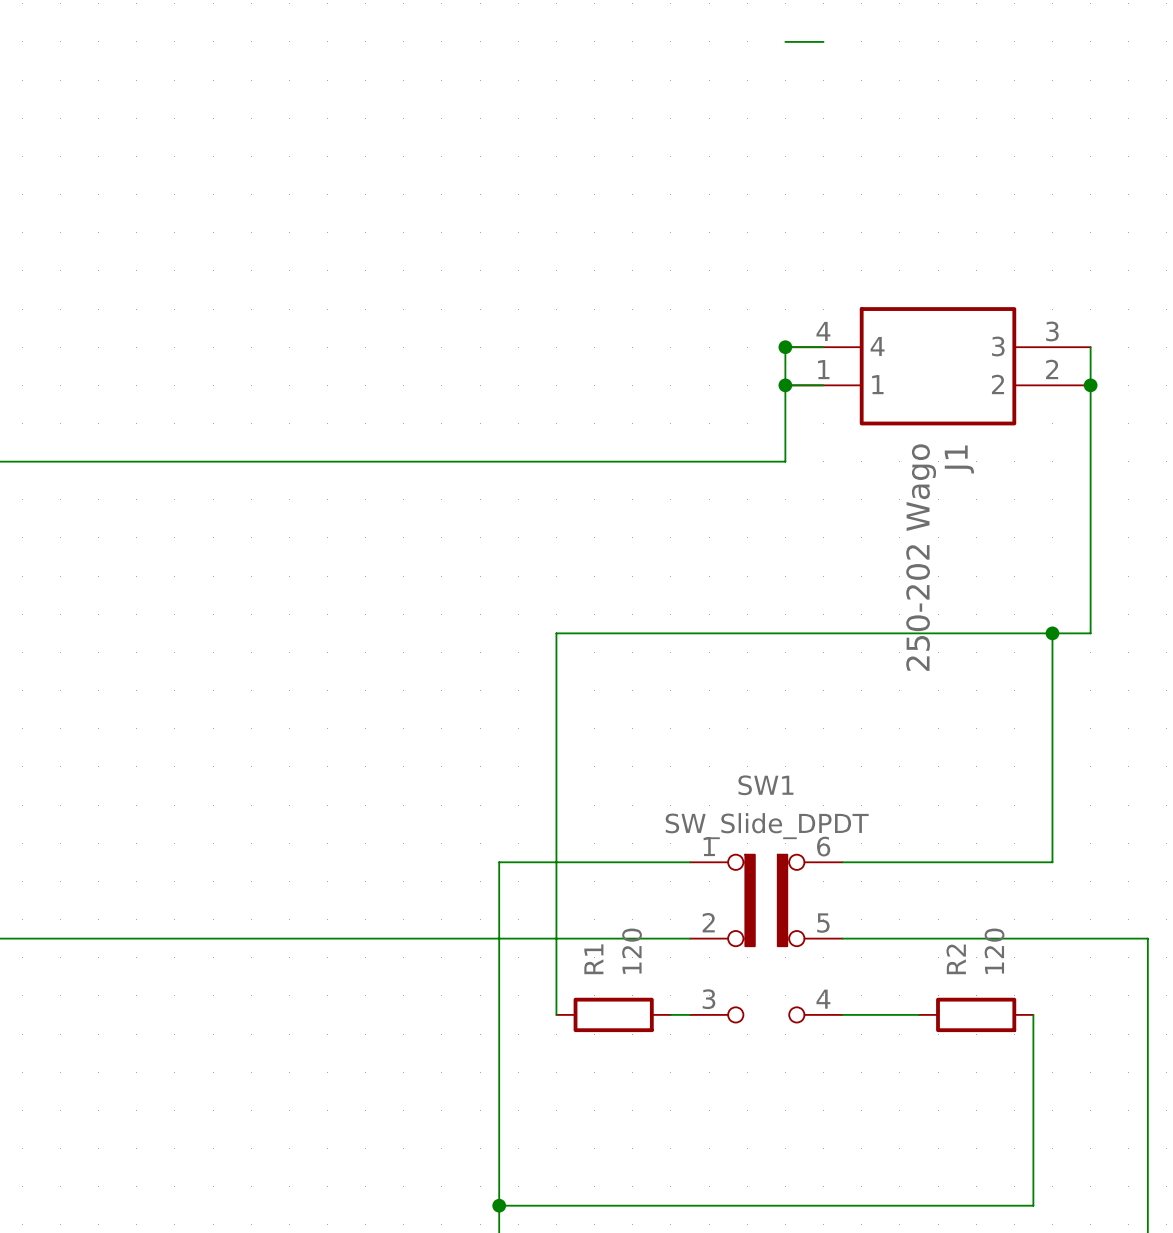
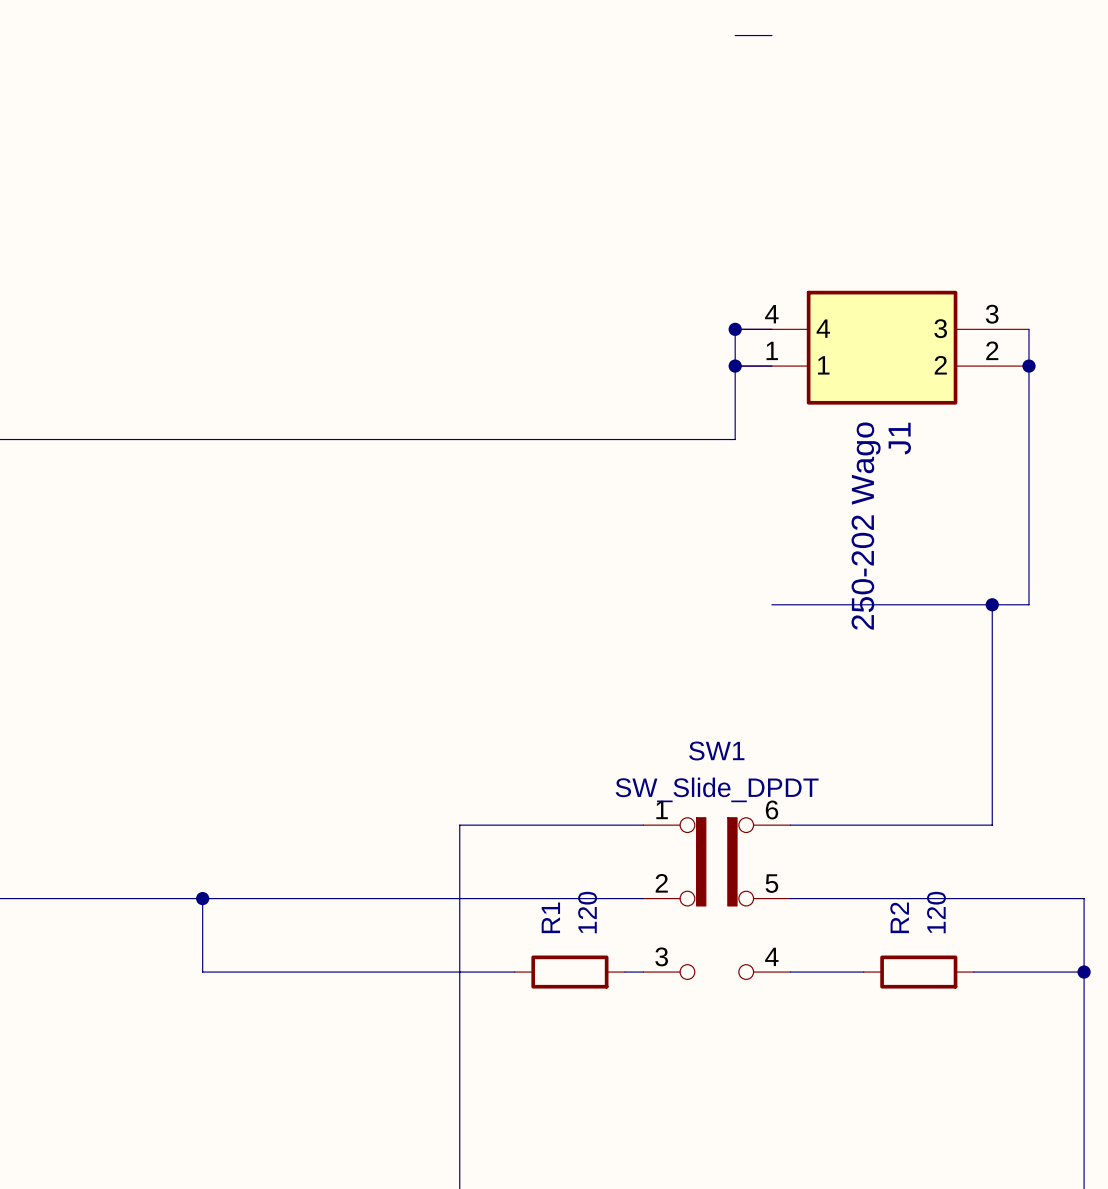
wire: (823, 633) (556, 633) (556, 1014) -> (202, 898) (202, 972) (514, 972)
junction: none -> (202, 898)
wire: (1033, 1014) (1033, 1205) (499, 1205) -> (973, 972) (1084, 972)
junction: none -> (1084, 972)
junction: (499, 1205) -> none

